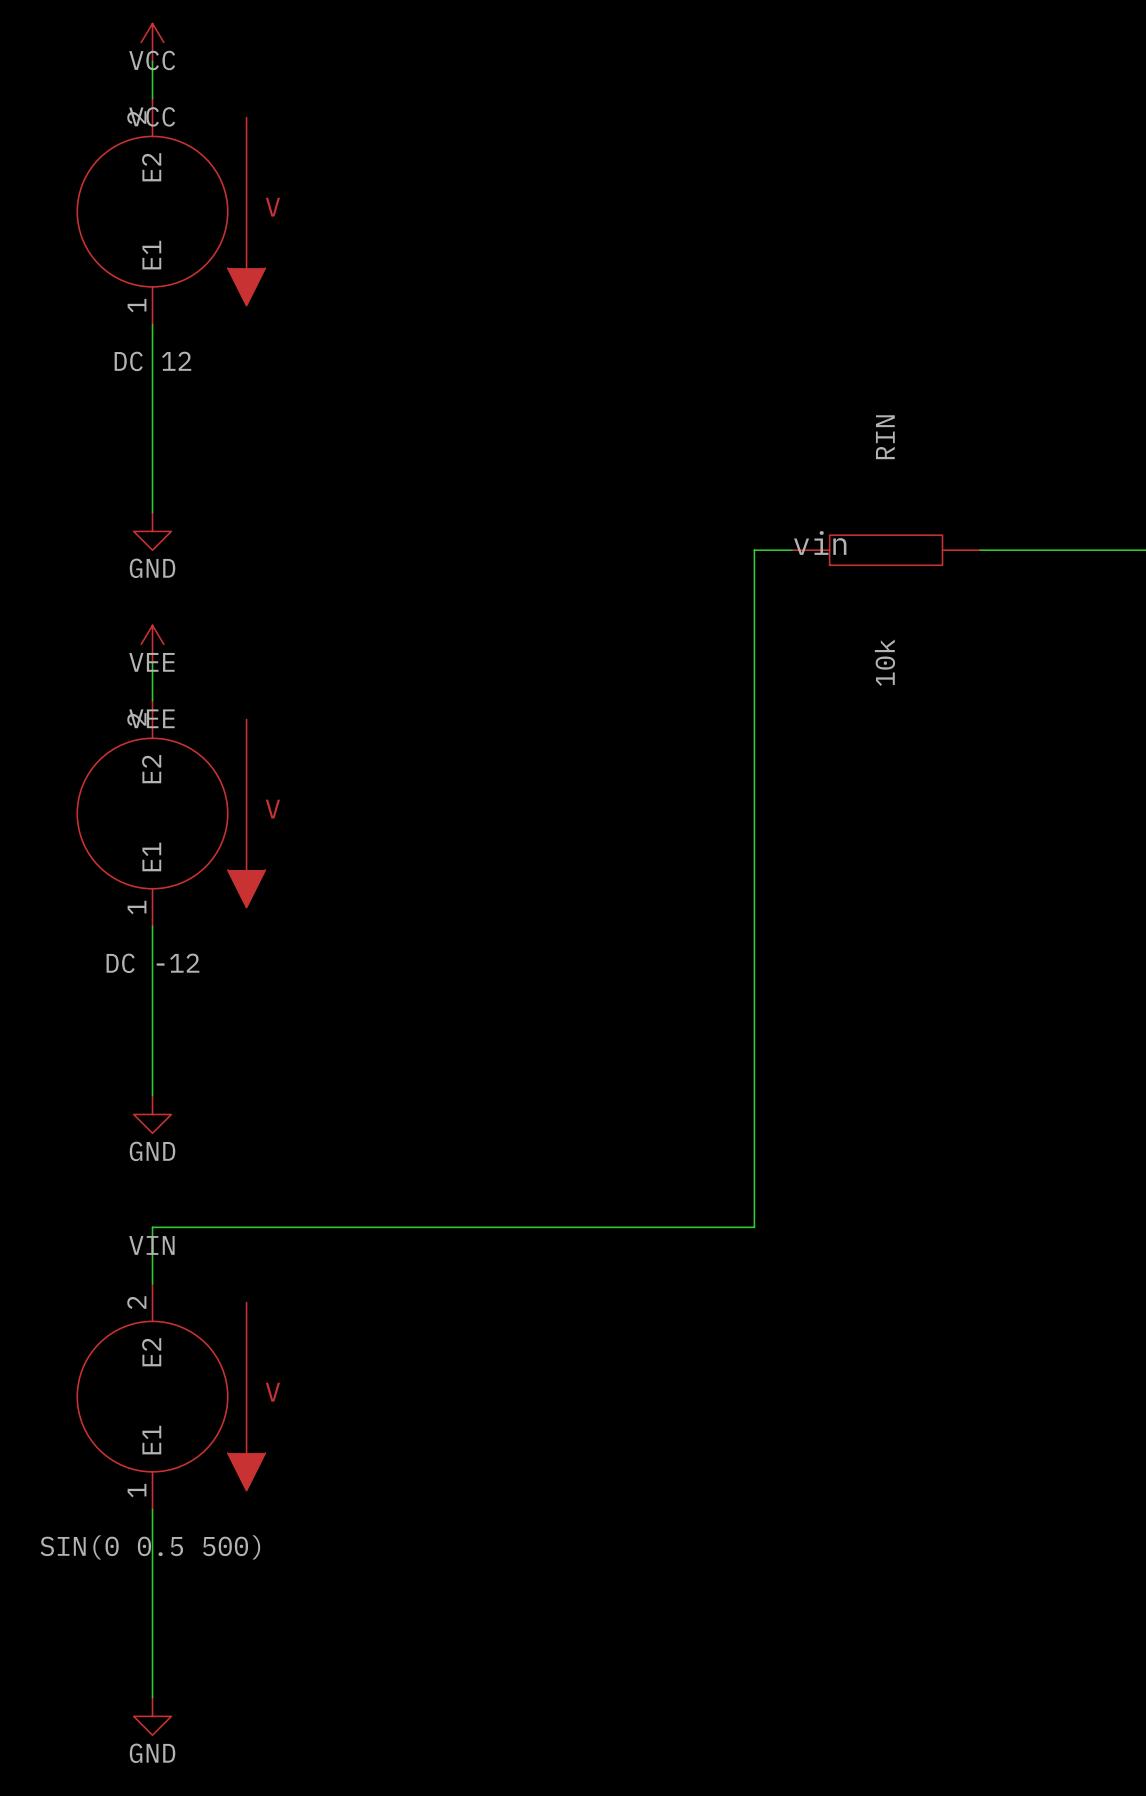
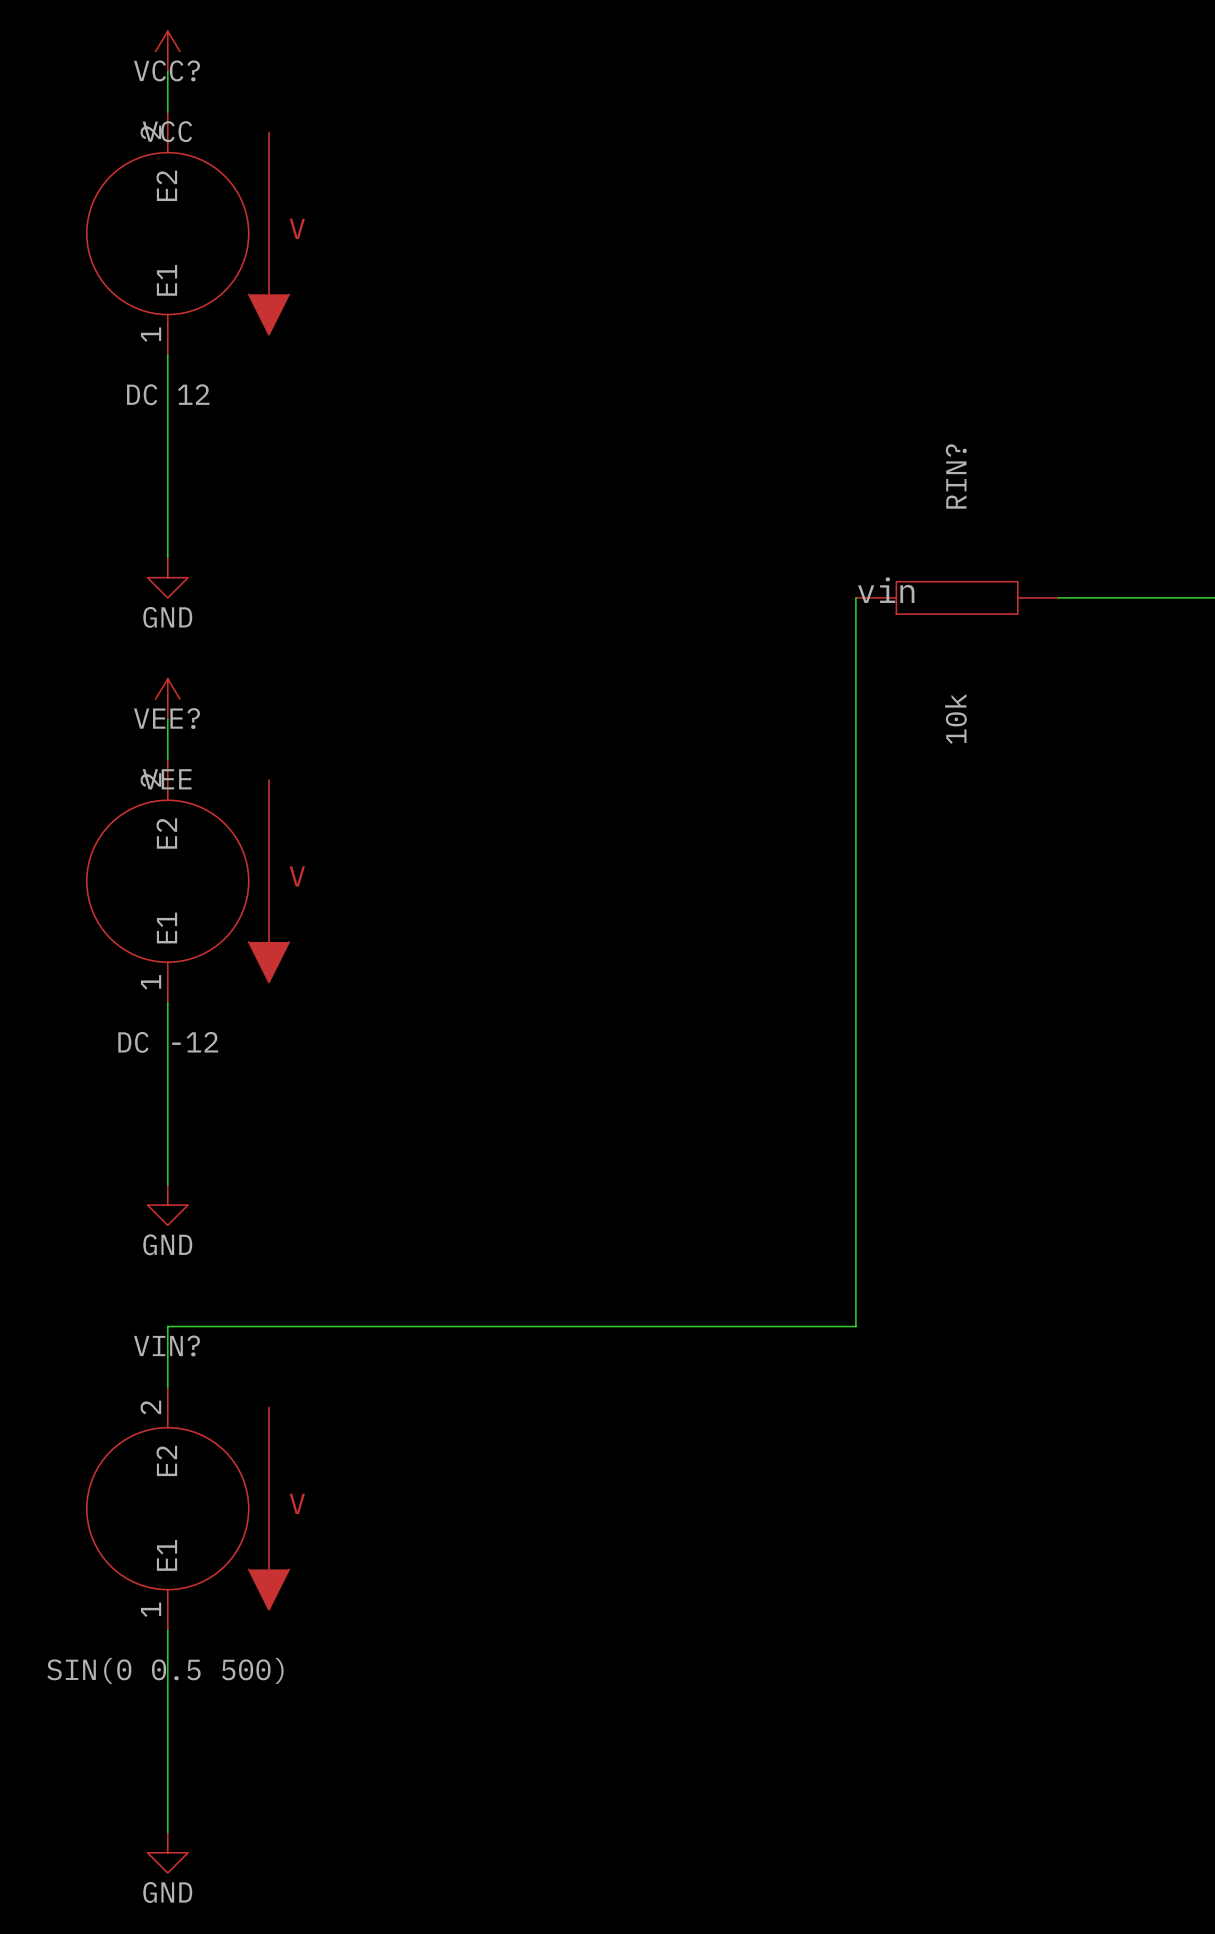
VCC name: VCC (152, 60) -> VCC? (166, 70)
RIN name: RIN (885, 437) -> RIN? (956, 476)
wire: (792, 550) (754, 550) (754, 1227) -> (855, 597) (855, 1326) (815, 1326)
VEE name: VEE (151, 662) -> VEE? (166, 718)
VIN name: VIN (151, 1245) -> VIN? (166, 1345)

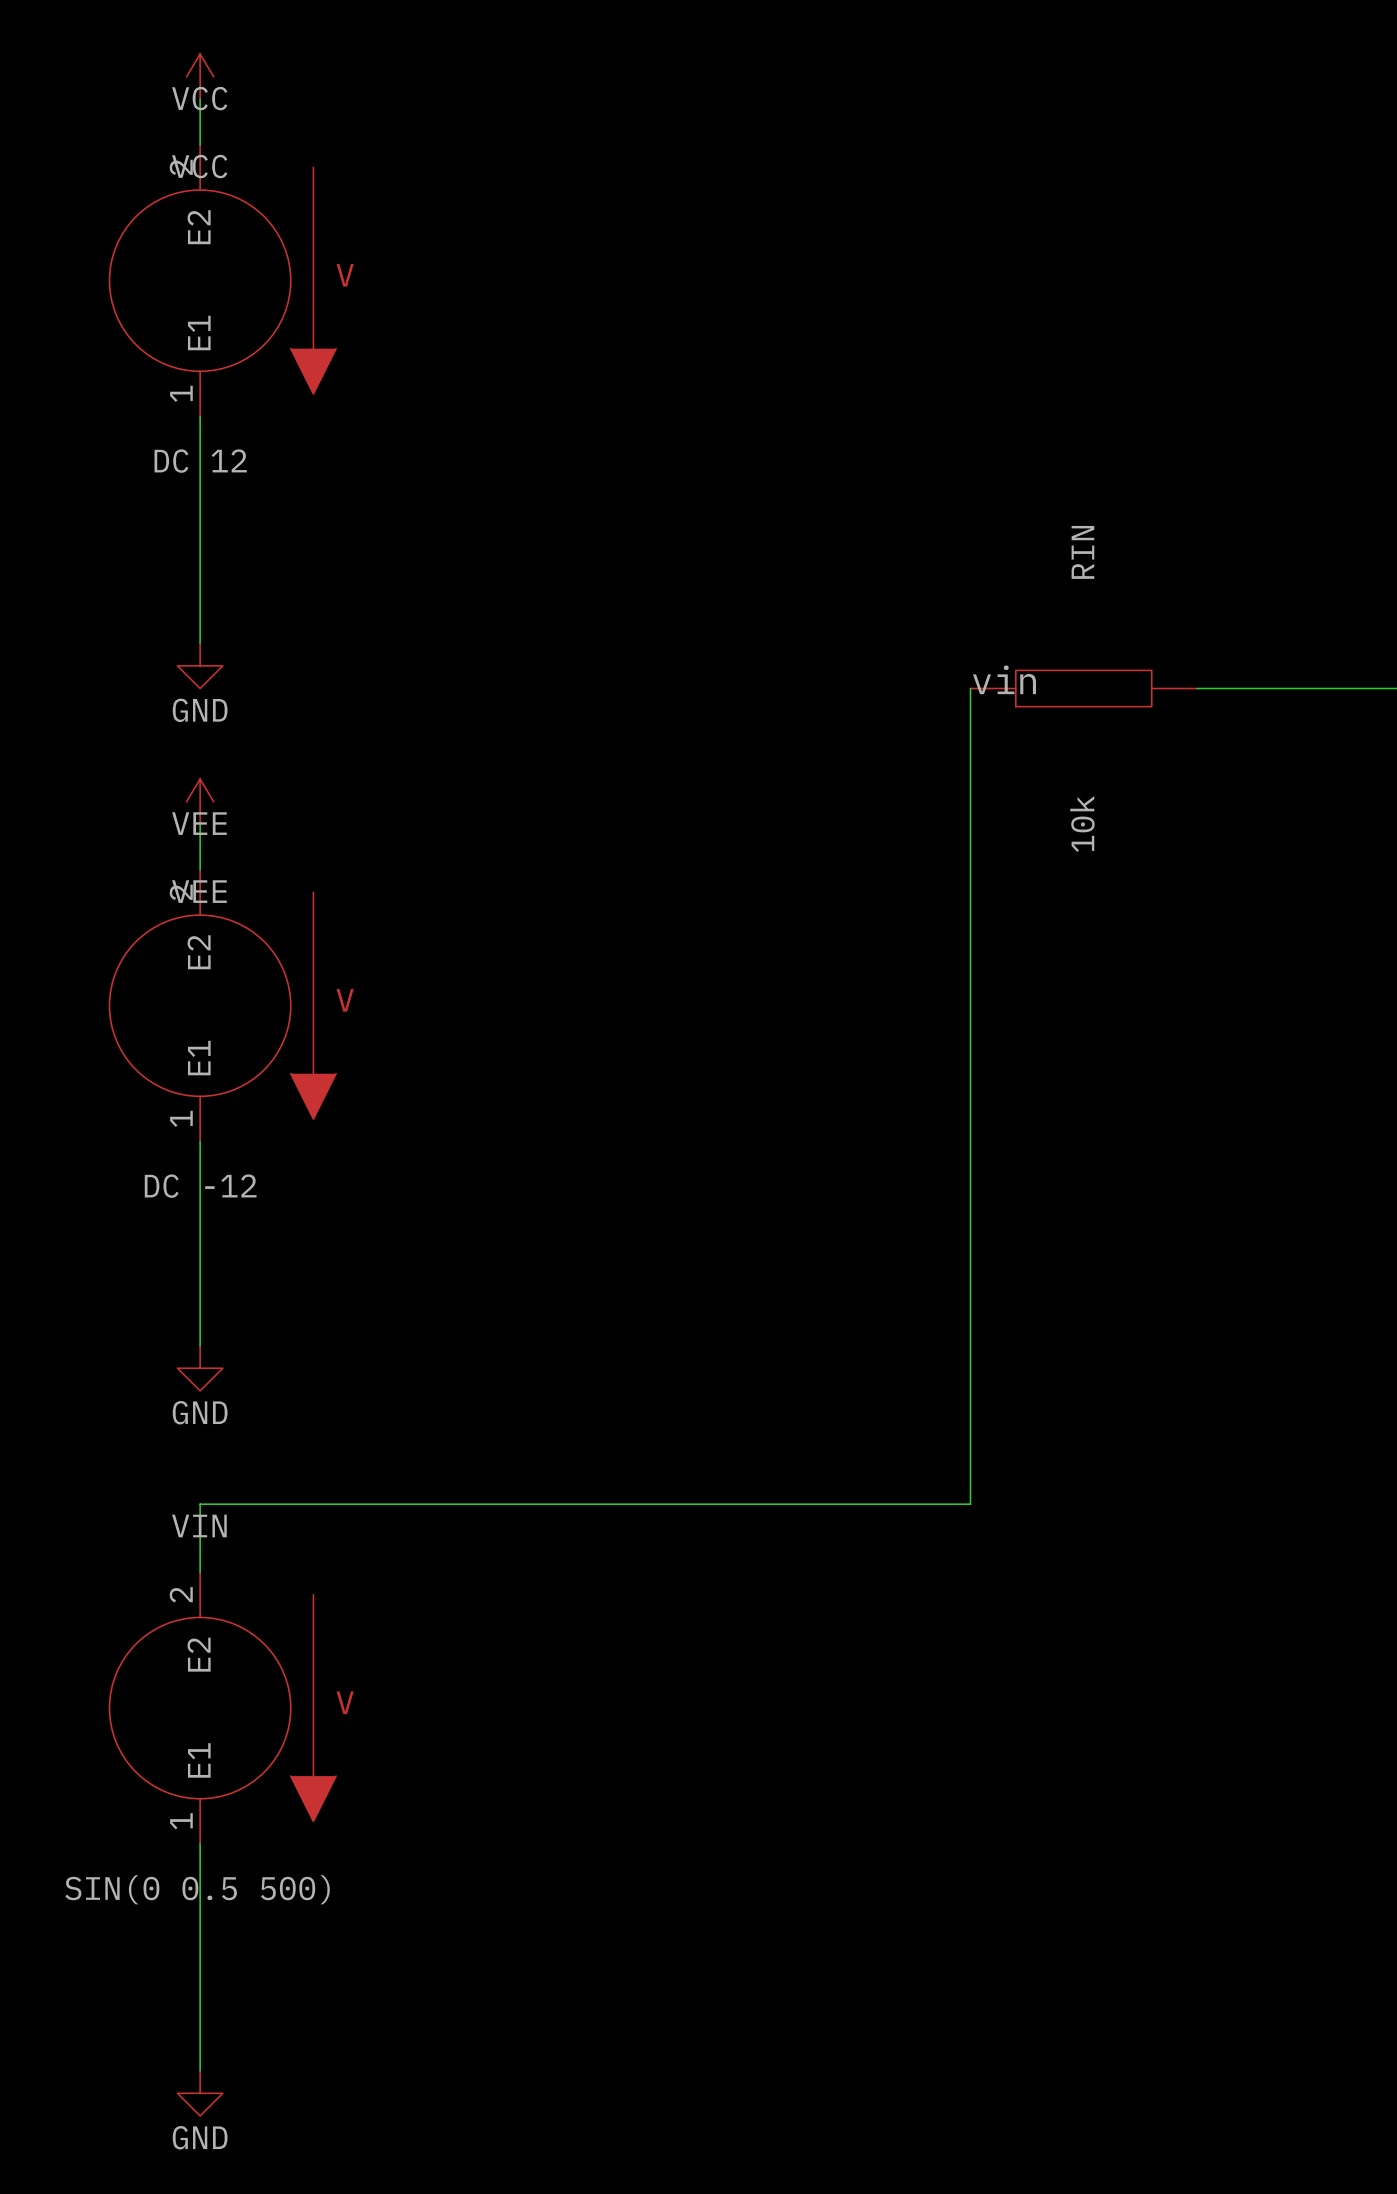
VCC? name: VCC? (166, 70) -> VCC (199, 98)
RIN? name: RIN? (956, 476) -> RIN (1082, 552)
VEE? name: VEE? (166, 718) -> VEE (199, 823)
VIN? name: VIN? (166, 1345) -> VIN (199, 1526)

